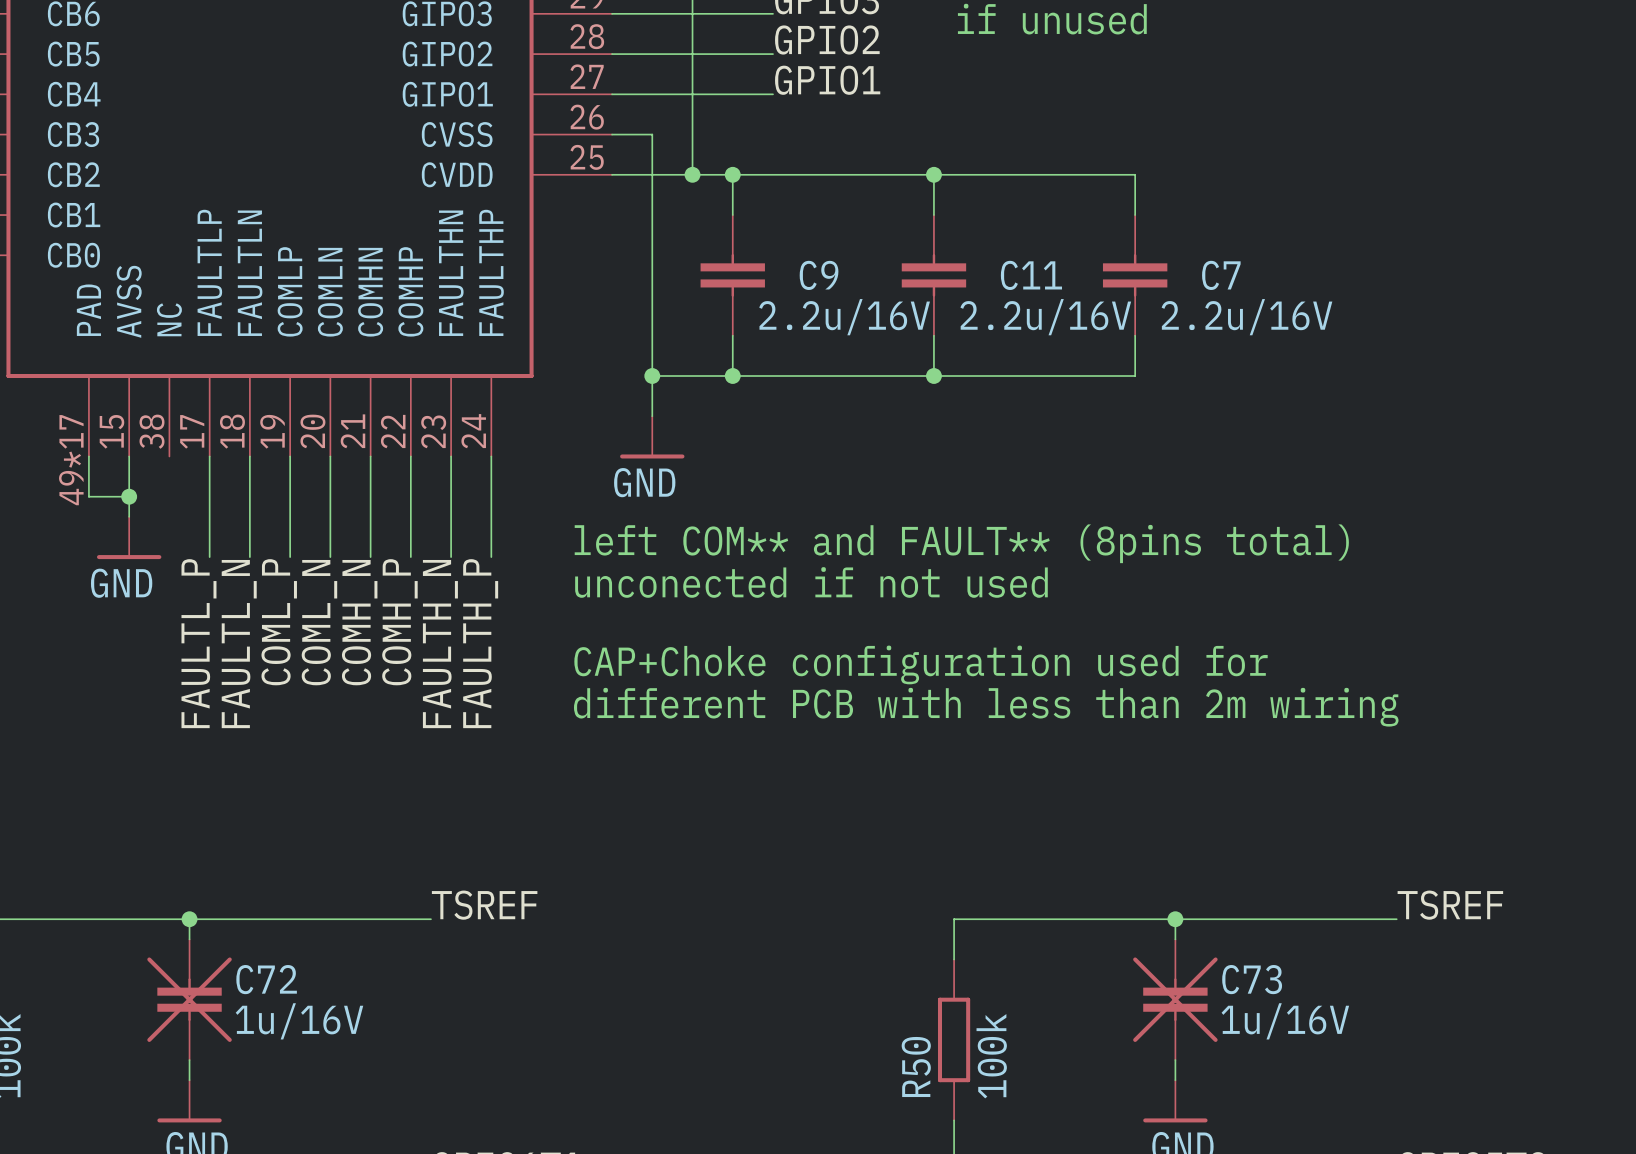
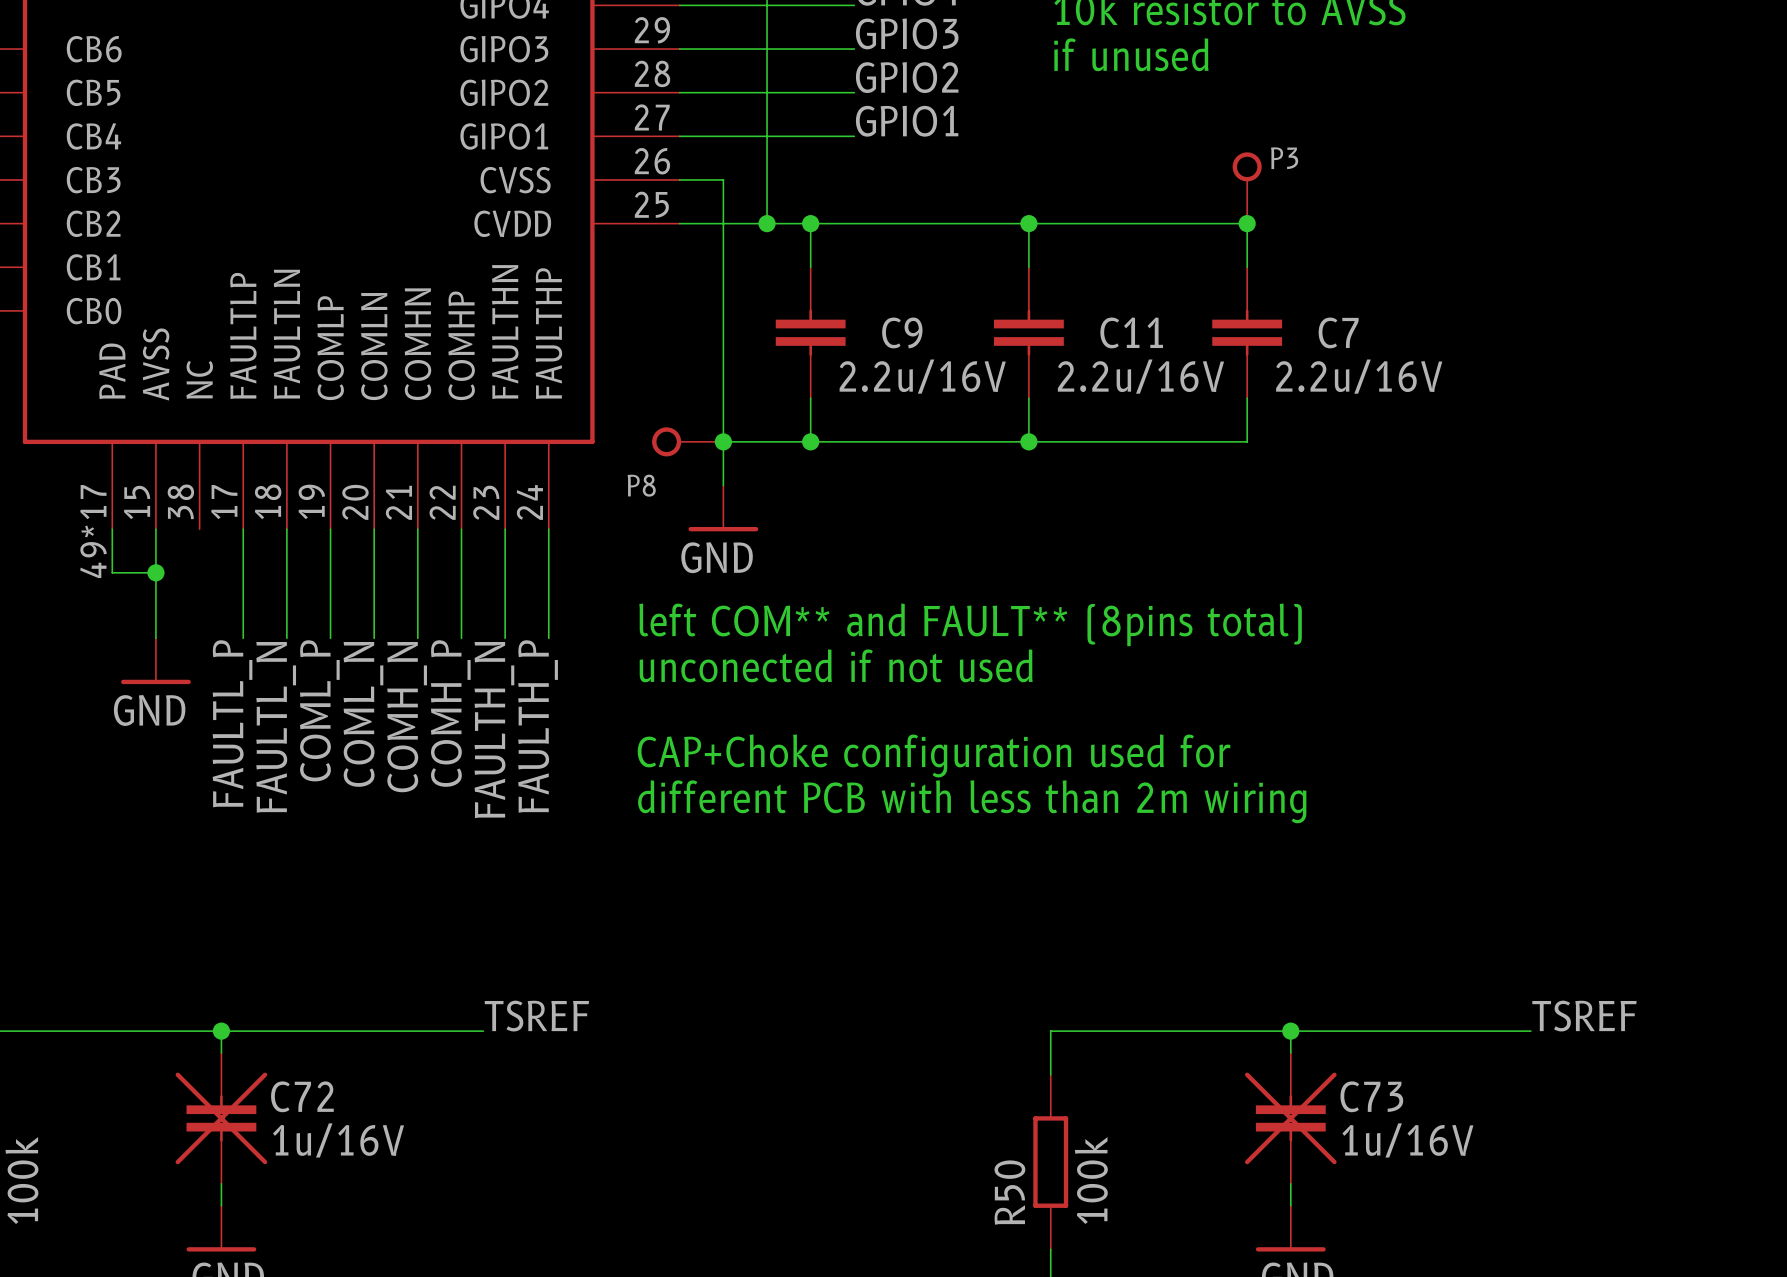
P3: none -> (1247, 187)
junction: none -> (1247, 223)
P8: none -> (687, 441)
power symbol position: GND (129, 537) -> GND (155, 661)

